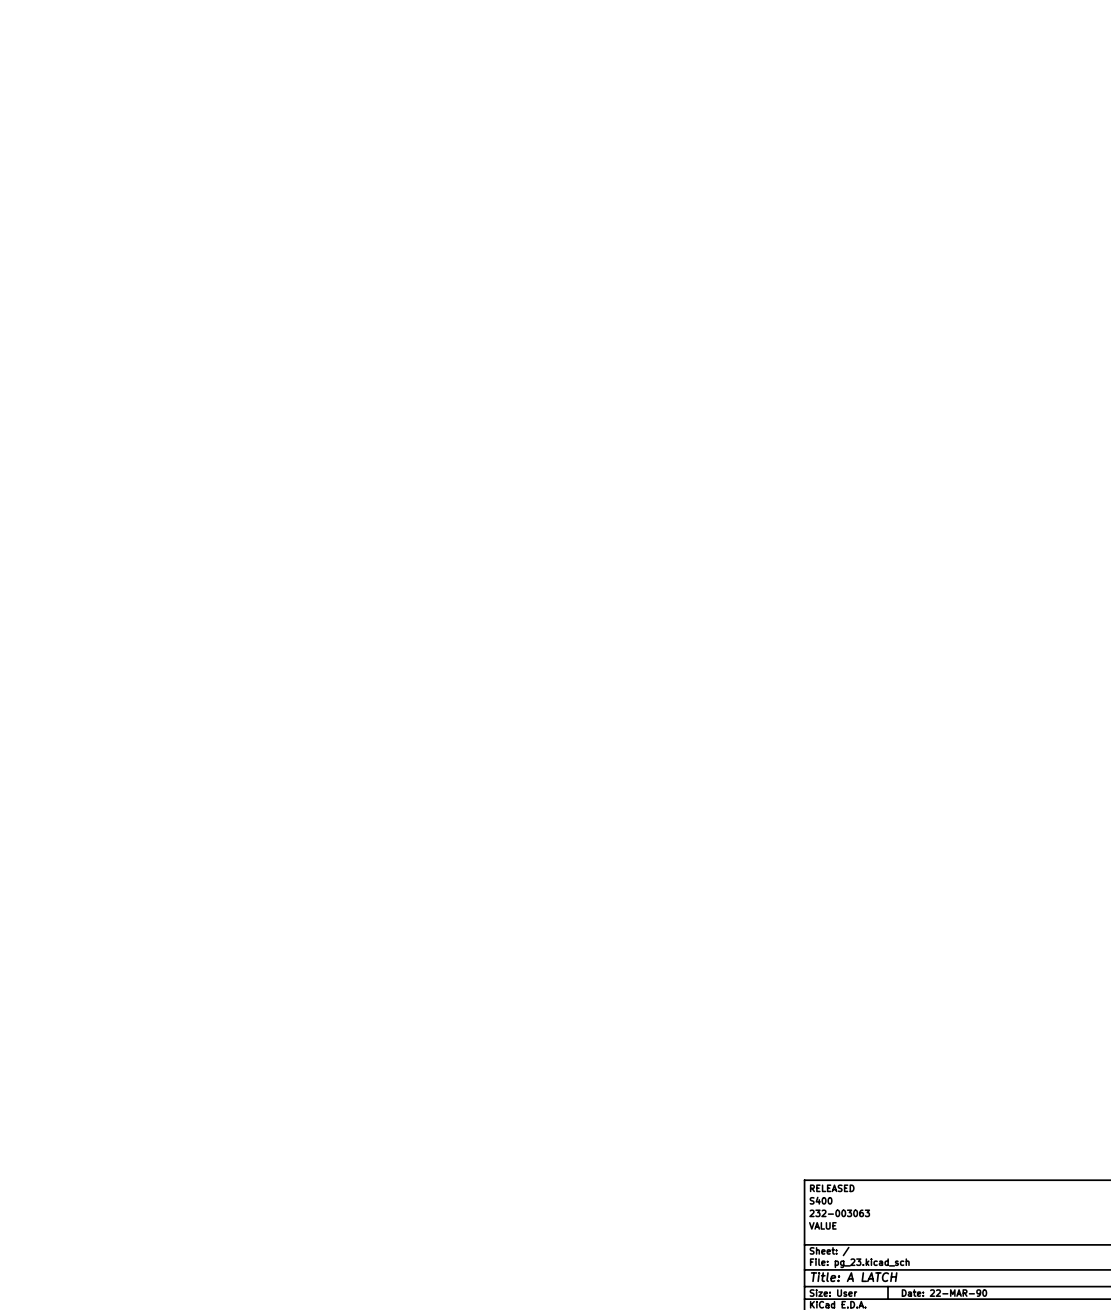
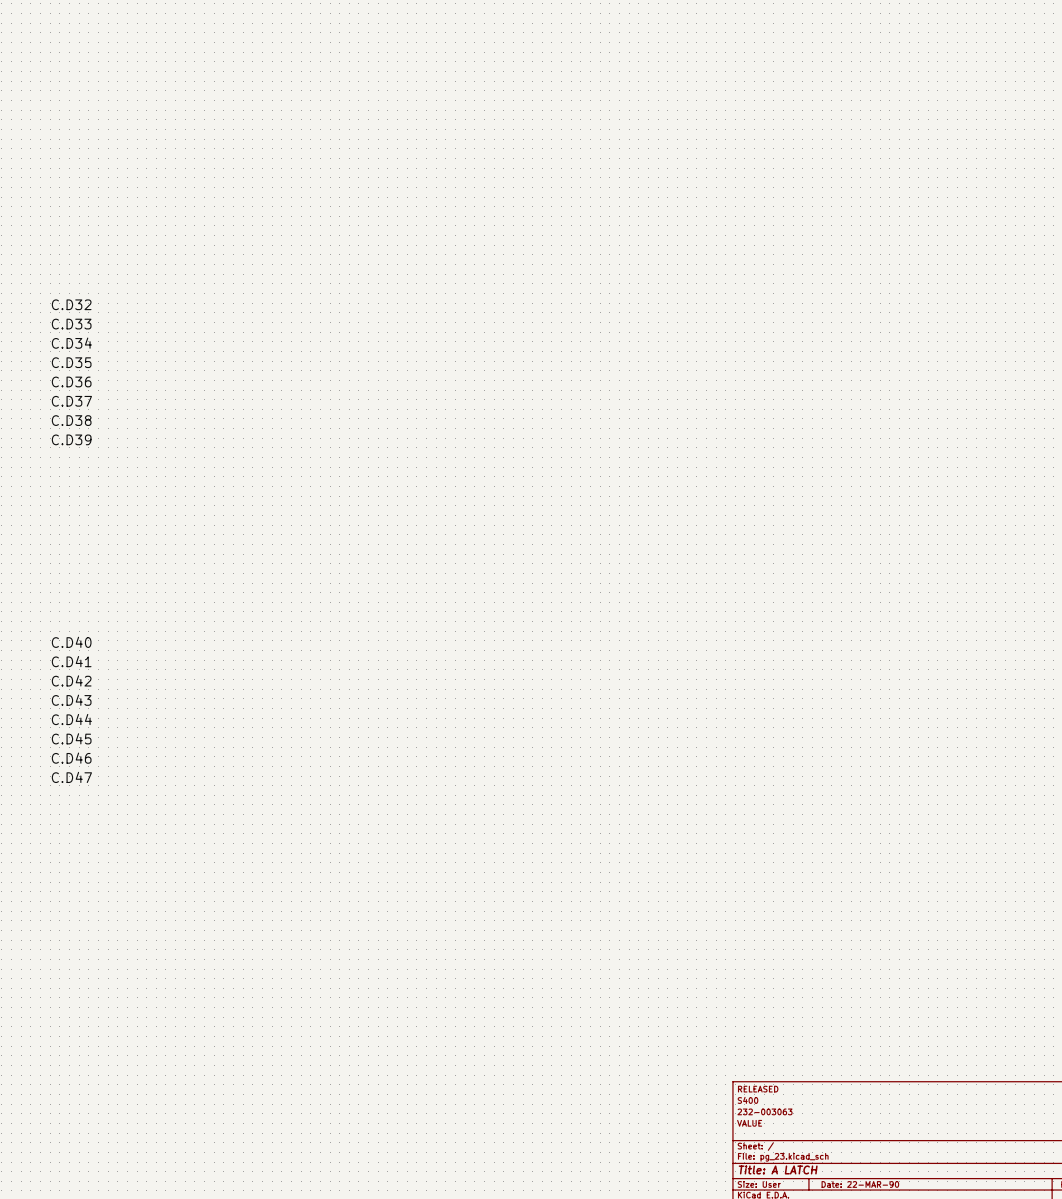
label: none -> C.D32 (71, 304)
label: none -> C.D33 (71, 324)
label: none -> C.D34 (71, 343)
label: none -> C.D35 (71, 362)
label: none -> C.D36 (71, 381)
label: none -> C.D37 (71, 401)
label: none -> C.D38 (71, 420)
label: none -> C.D39 (71, 439)
label: none -> C.D40 (71, 642)
label: none -> C.D41 (71, 661)
label: none -> C.D42 (71, 680)
label: none -> C.D43 (71, 700)
label: none -> C.D44 (71, 719)
label: none -> C.D45 (71, 738)
label: none -> C.D46 (71, 758)
label: none -> C.D47 (71, 777)

